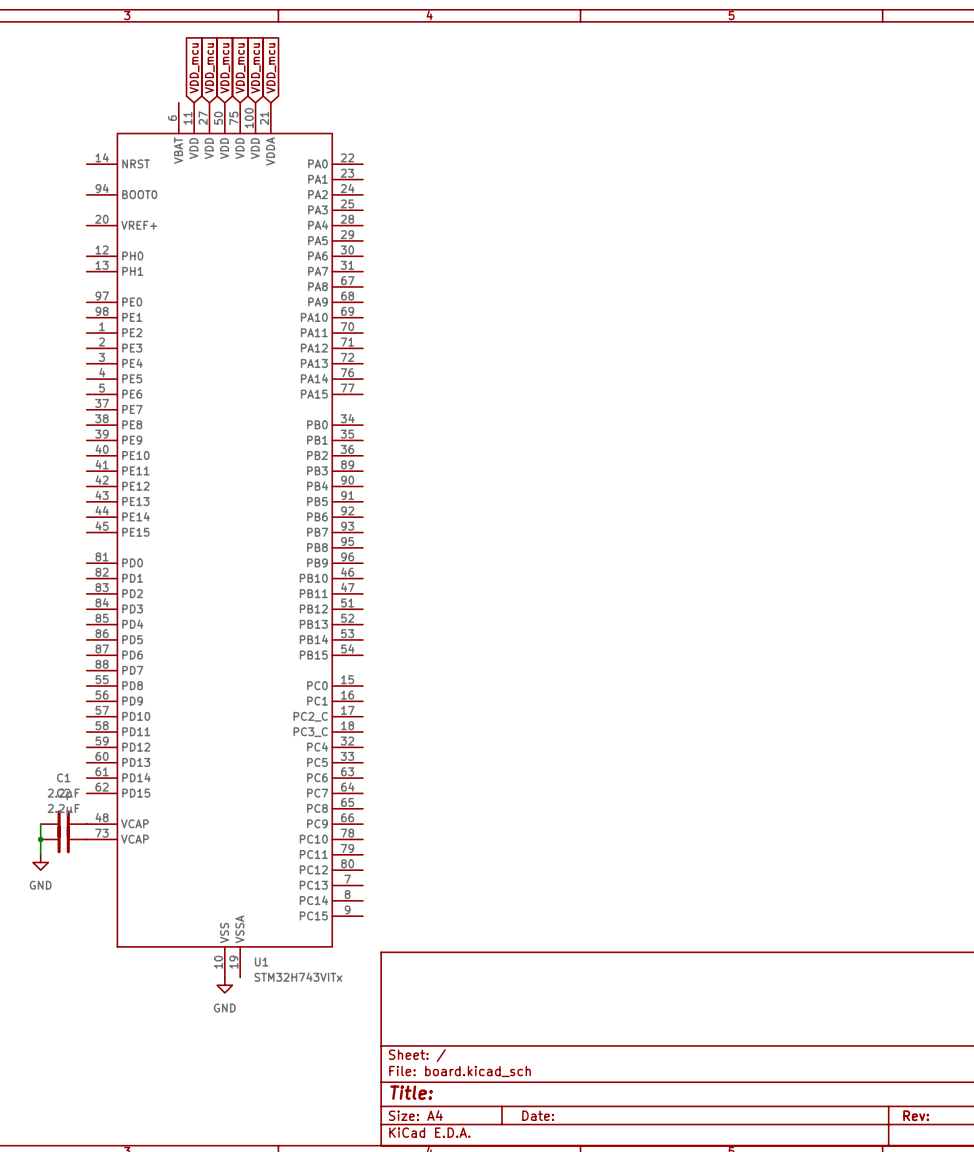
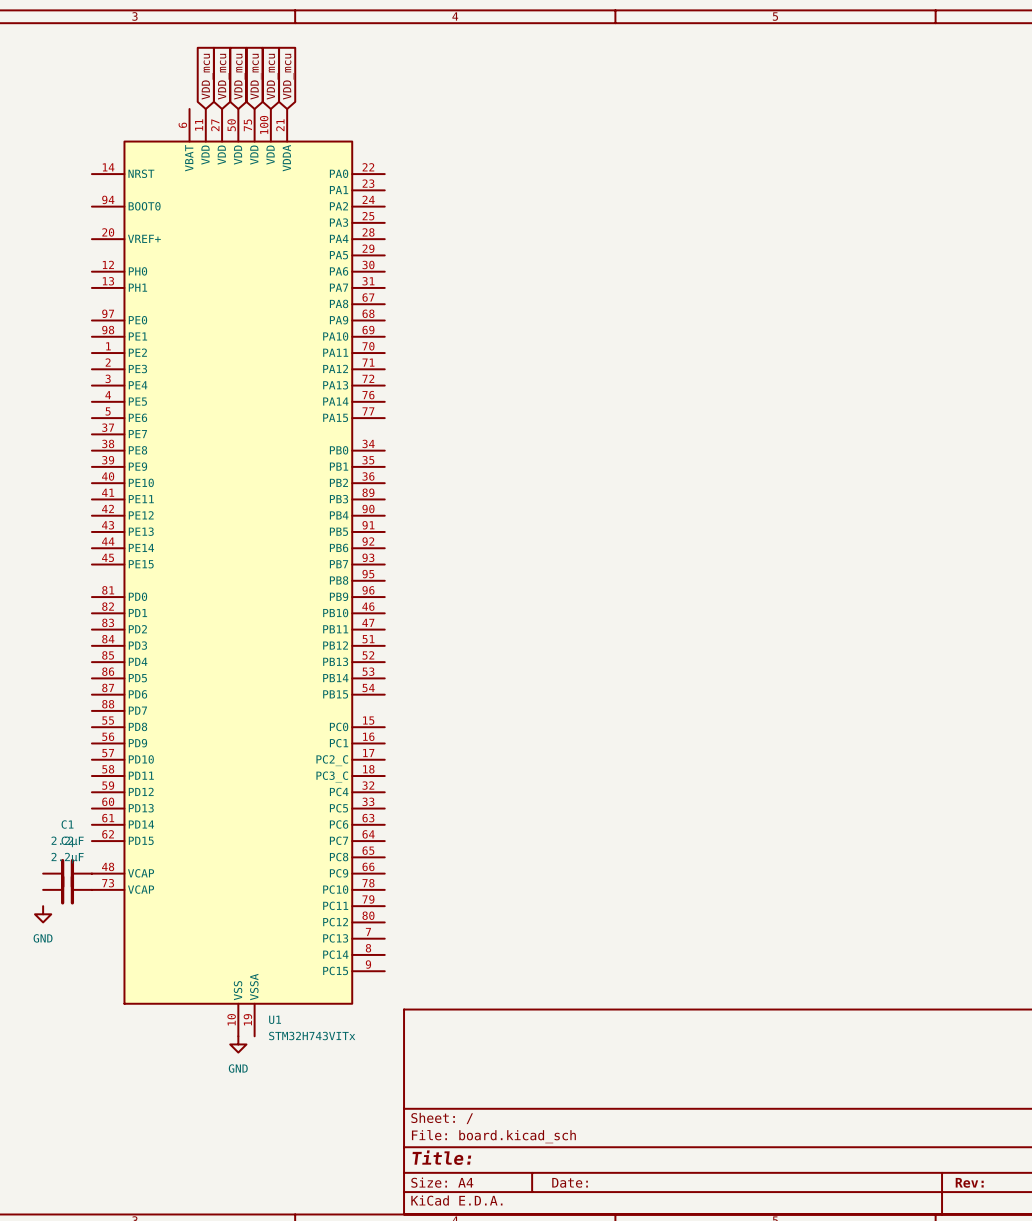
wire: (40, 824) (40, 854) -> none
junction: (40, 839) -> none

